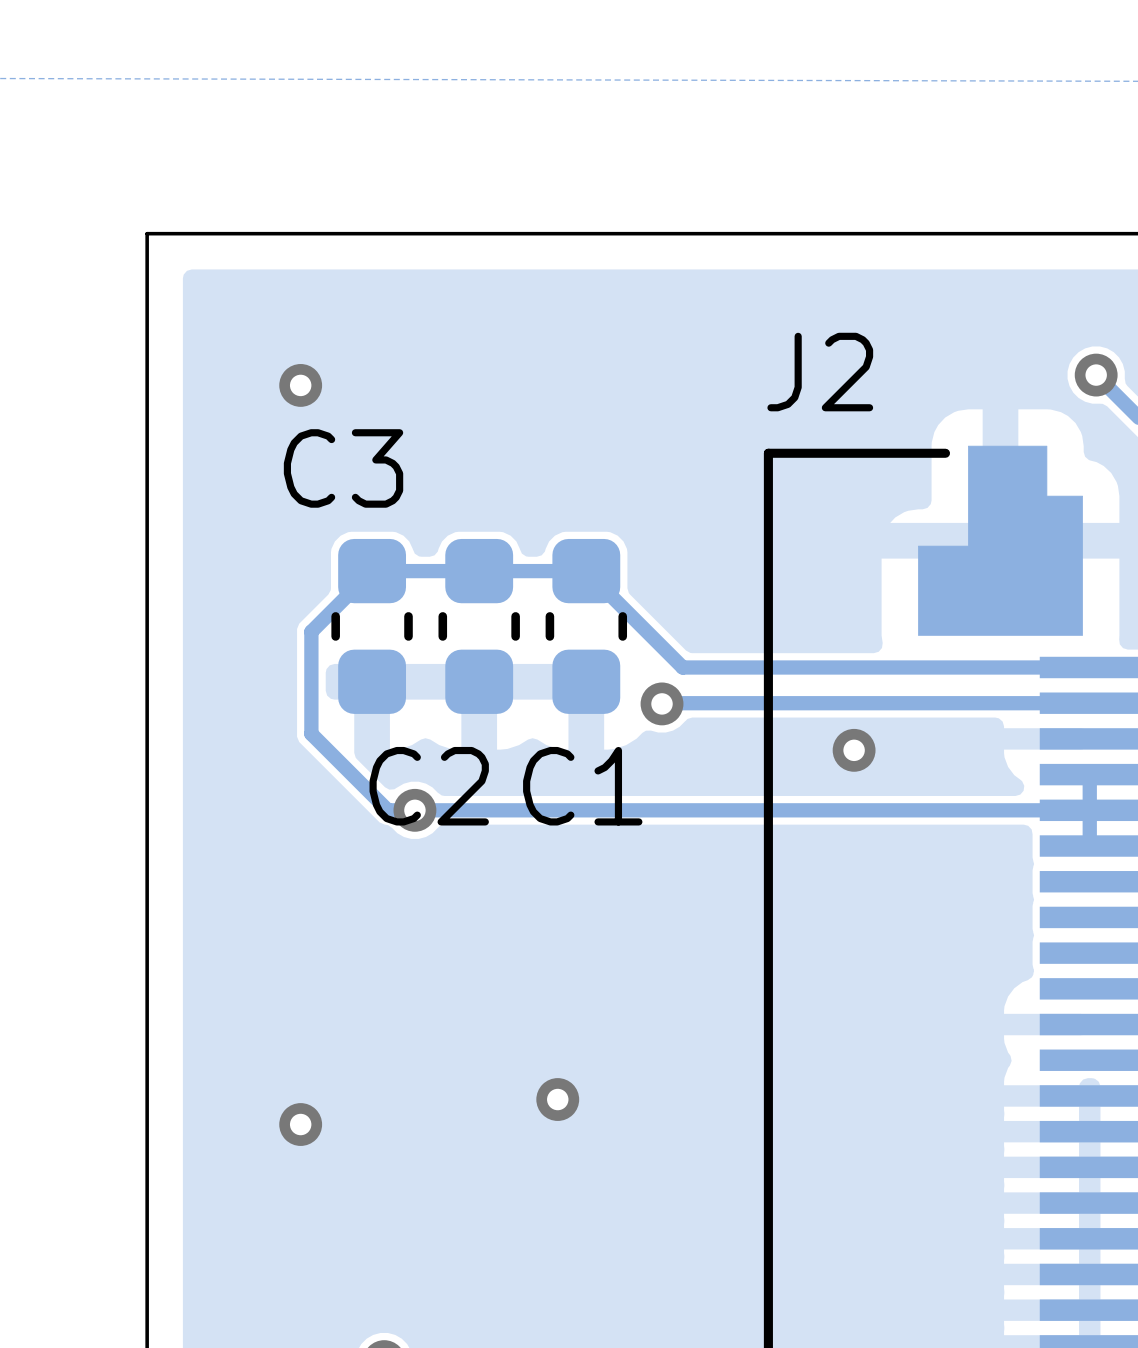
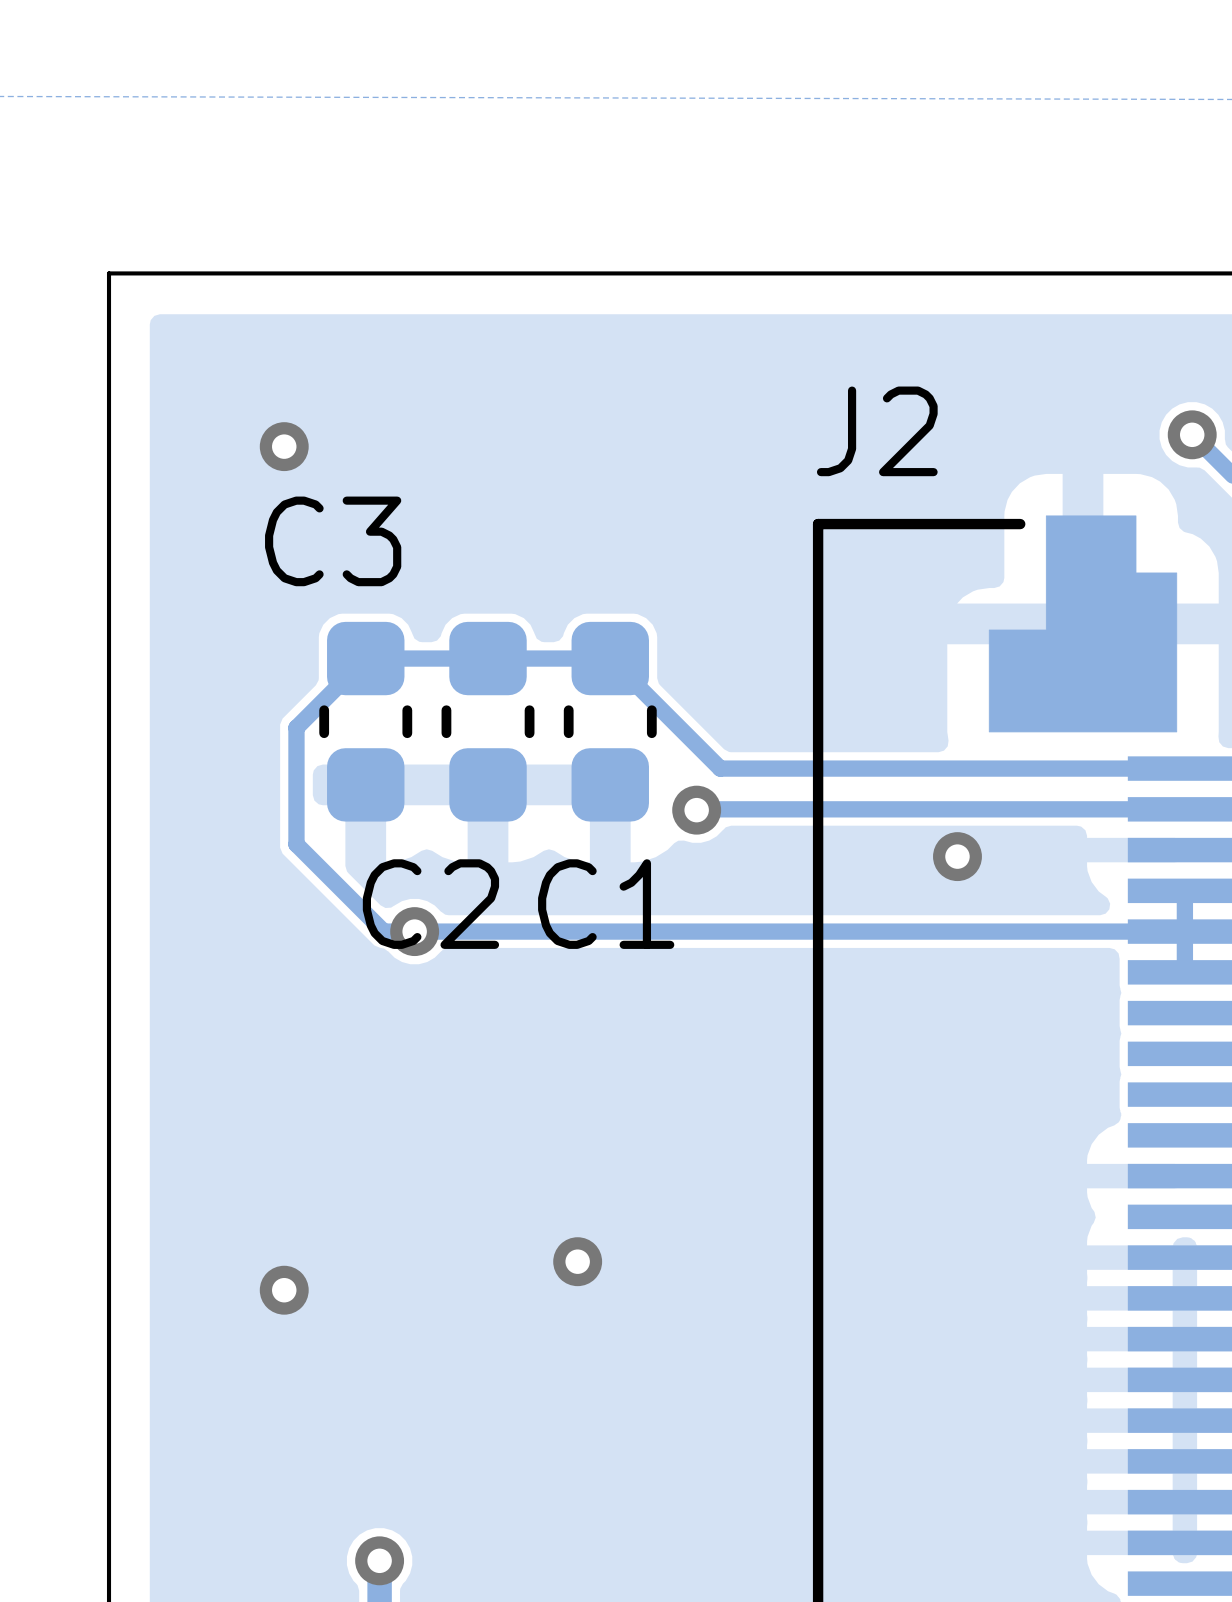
via position: (854, 750) -> (957, 856)

